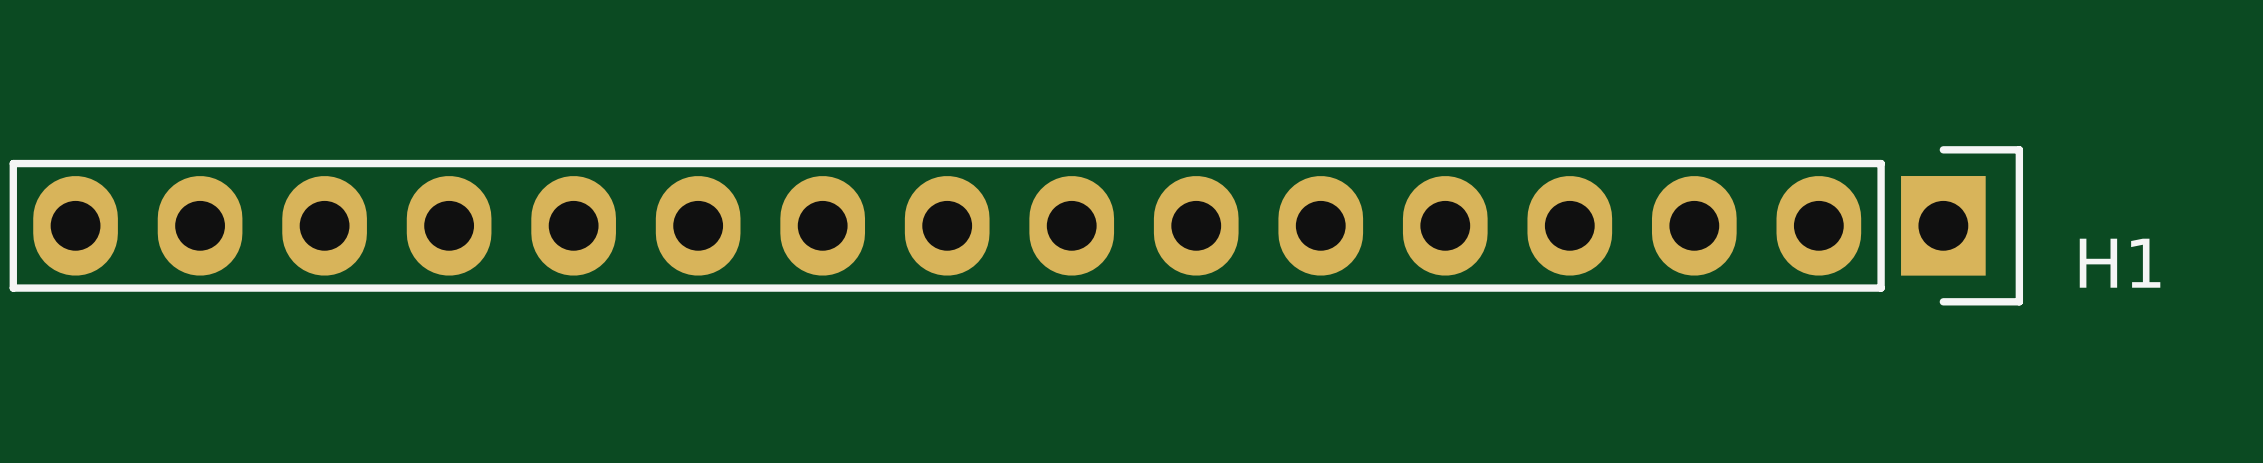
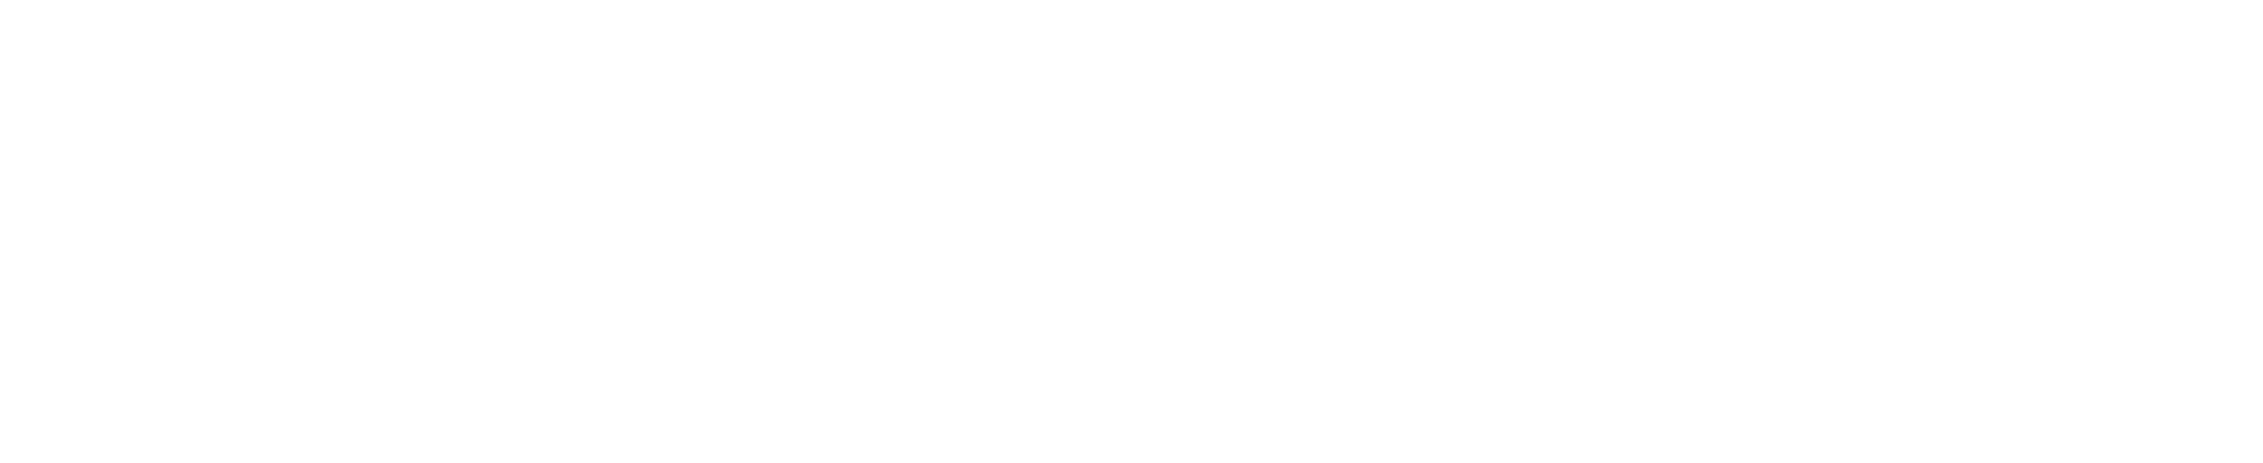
H1: (1016, 225) -> none

